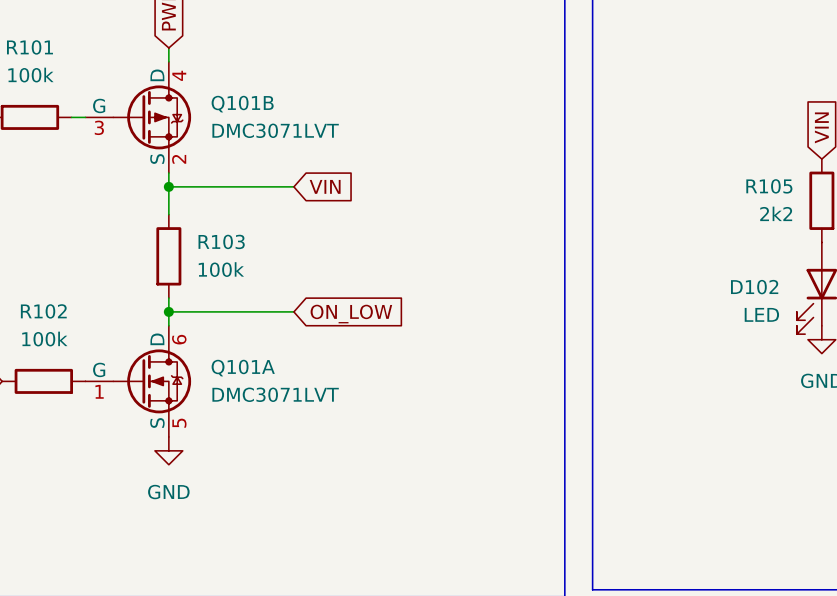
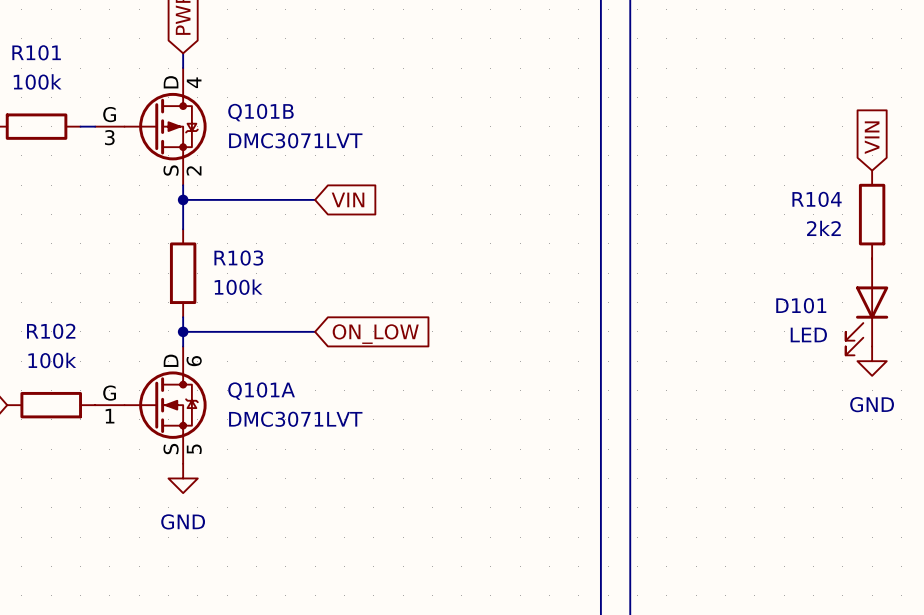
R105 name: R105 (769, 186) -> R104 (817, 199)
D102 name: D102 (754, 287) -> D101 (801, 305)

